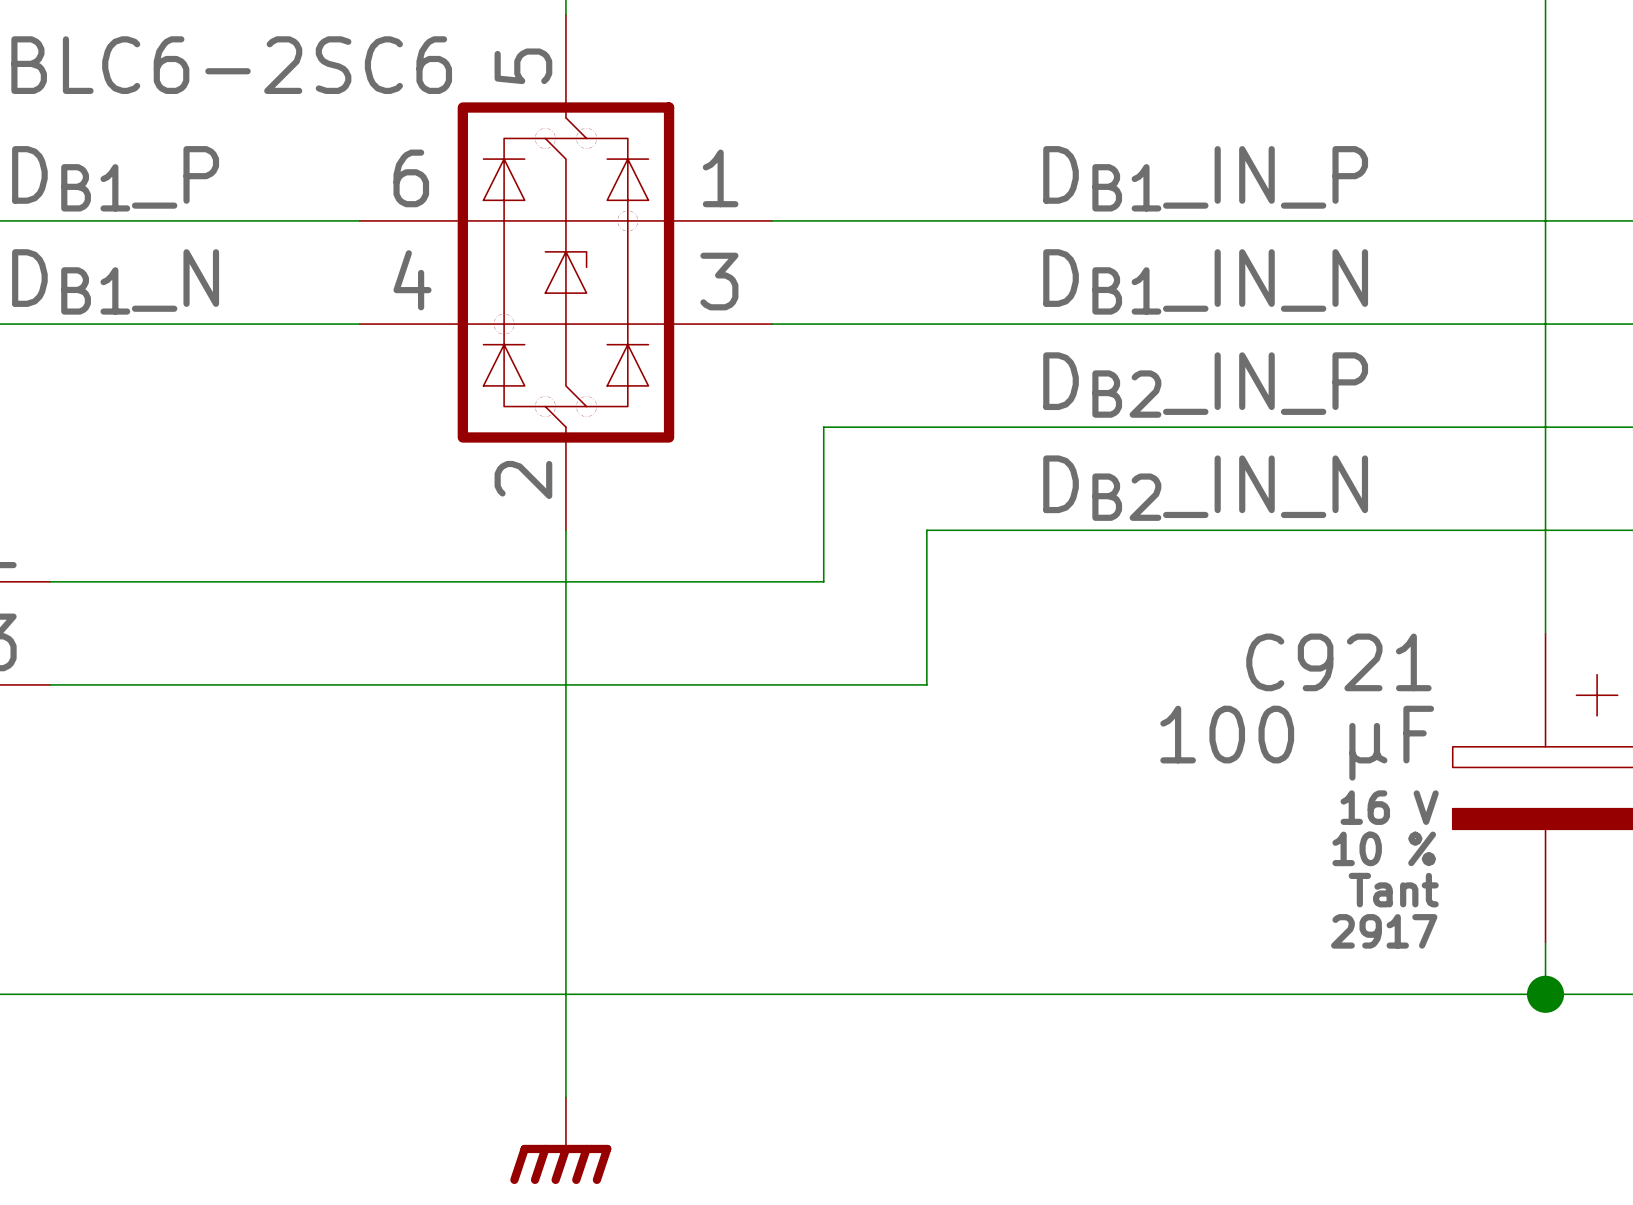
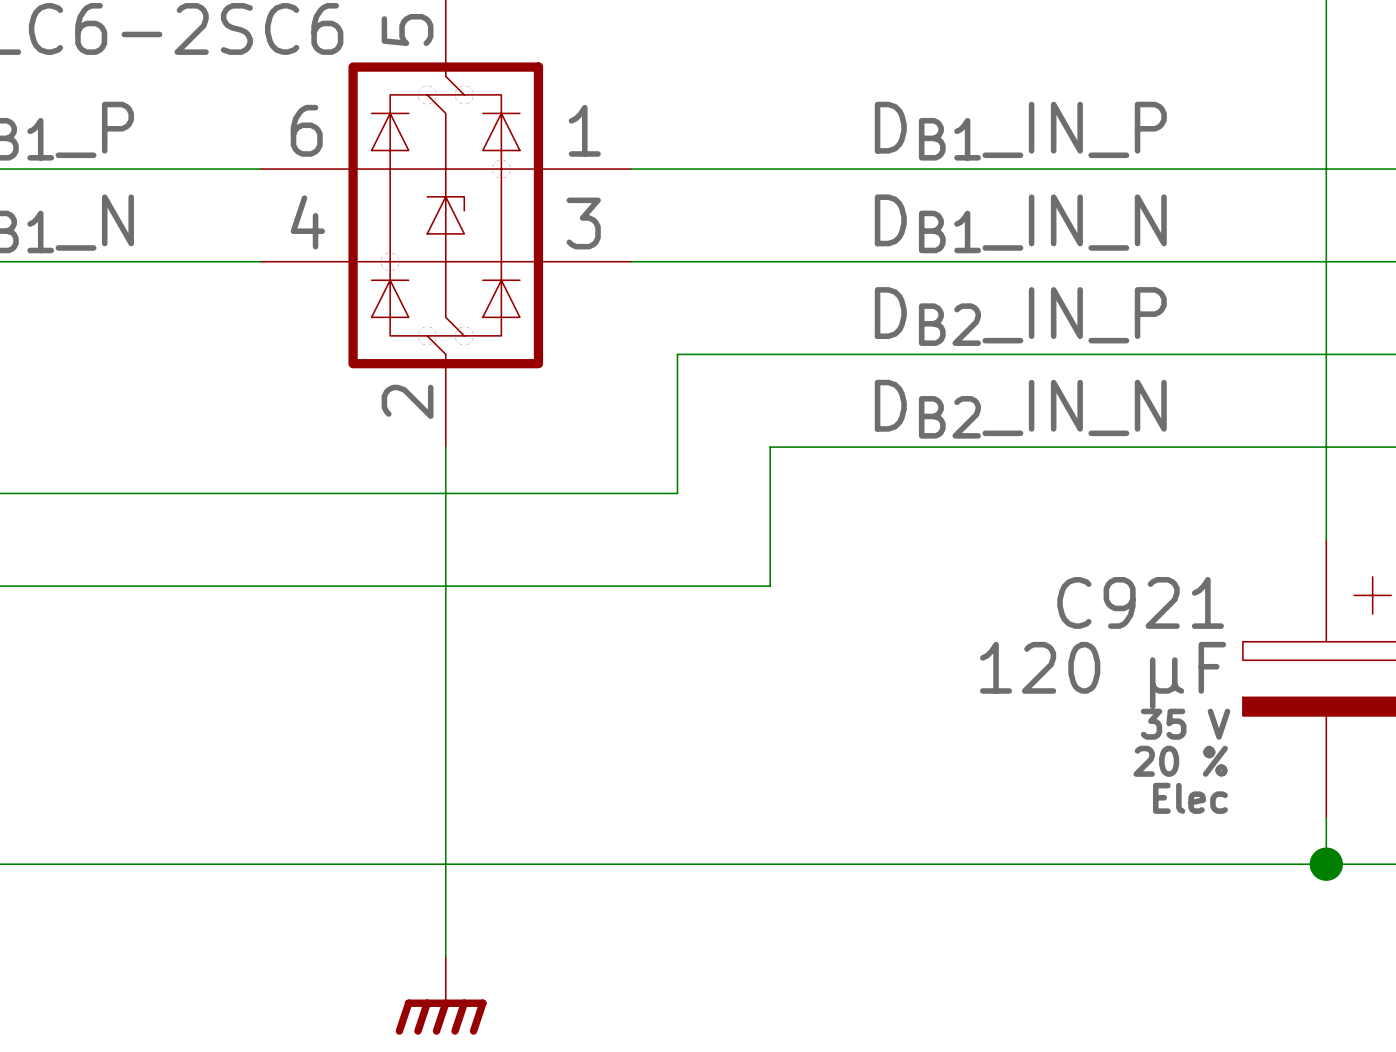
C921 name position: C921 (1338, 662) -> C921 (1140, 602)
C921 value: 100 µF (1297, 743) -> 120 µF (1103, 675)
C921 text: 16 V (1389, 807) -> 35 V (1185, 724)
C921 text: 10 % (1384, 848) -> 20 % (1180, 761)
C921 text: Tant (1393, 890) -> Elec (1190, 798)
C921 text: 2917 (1384, 931) -> none

